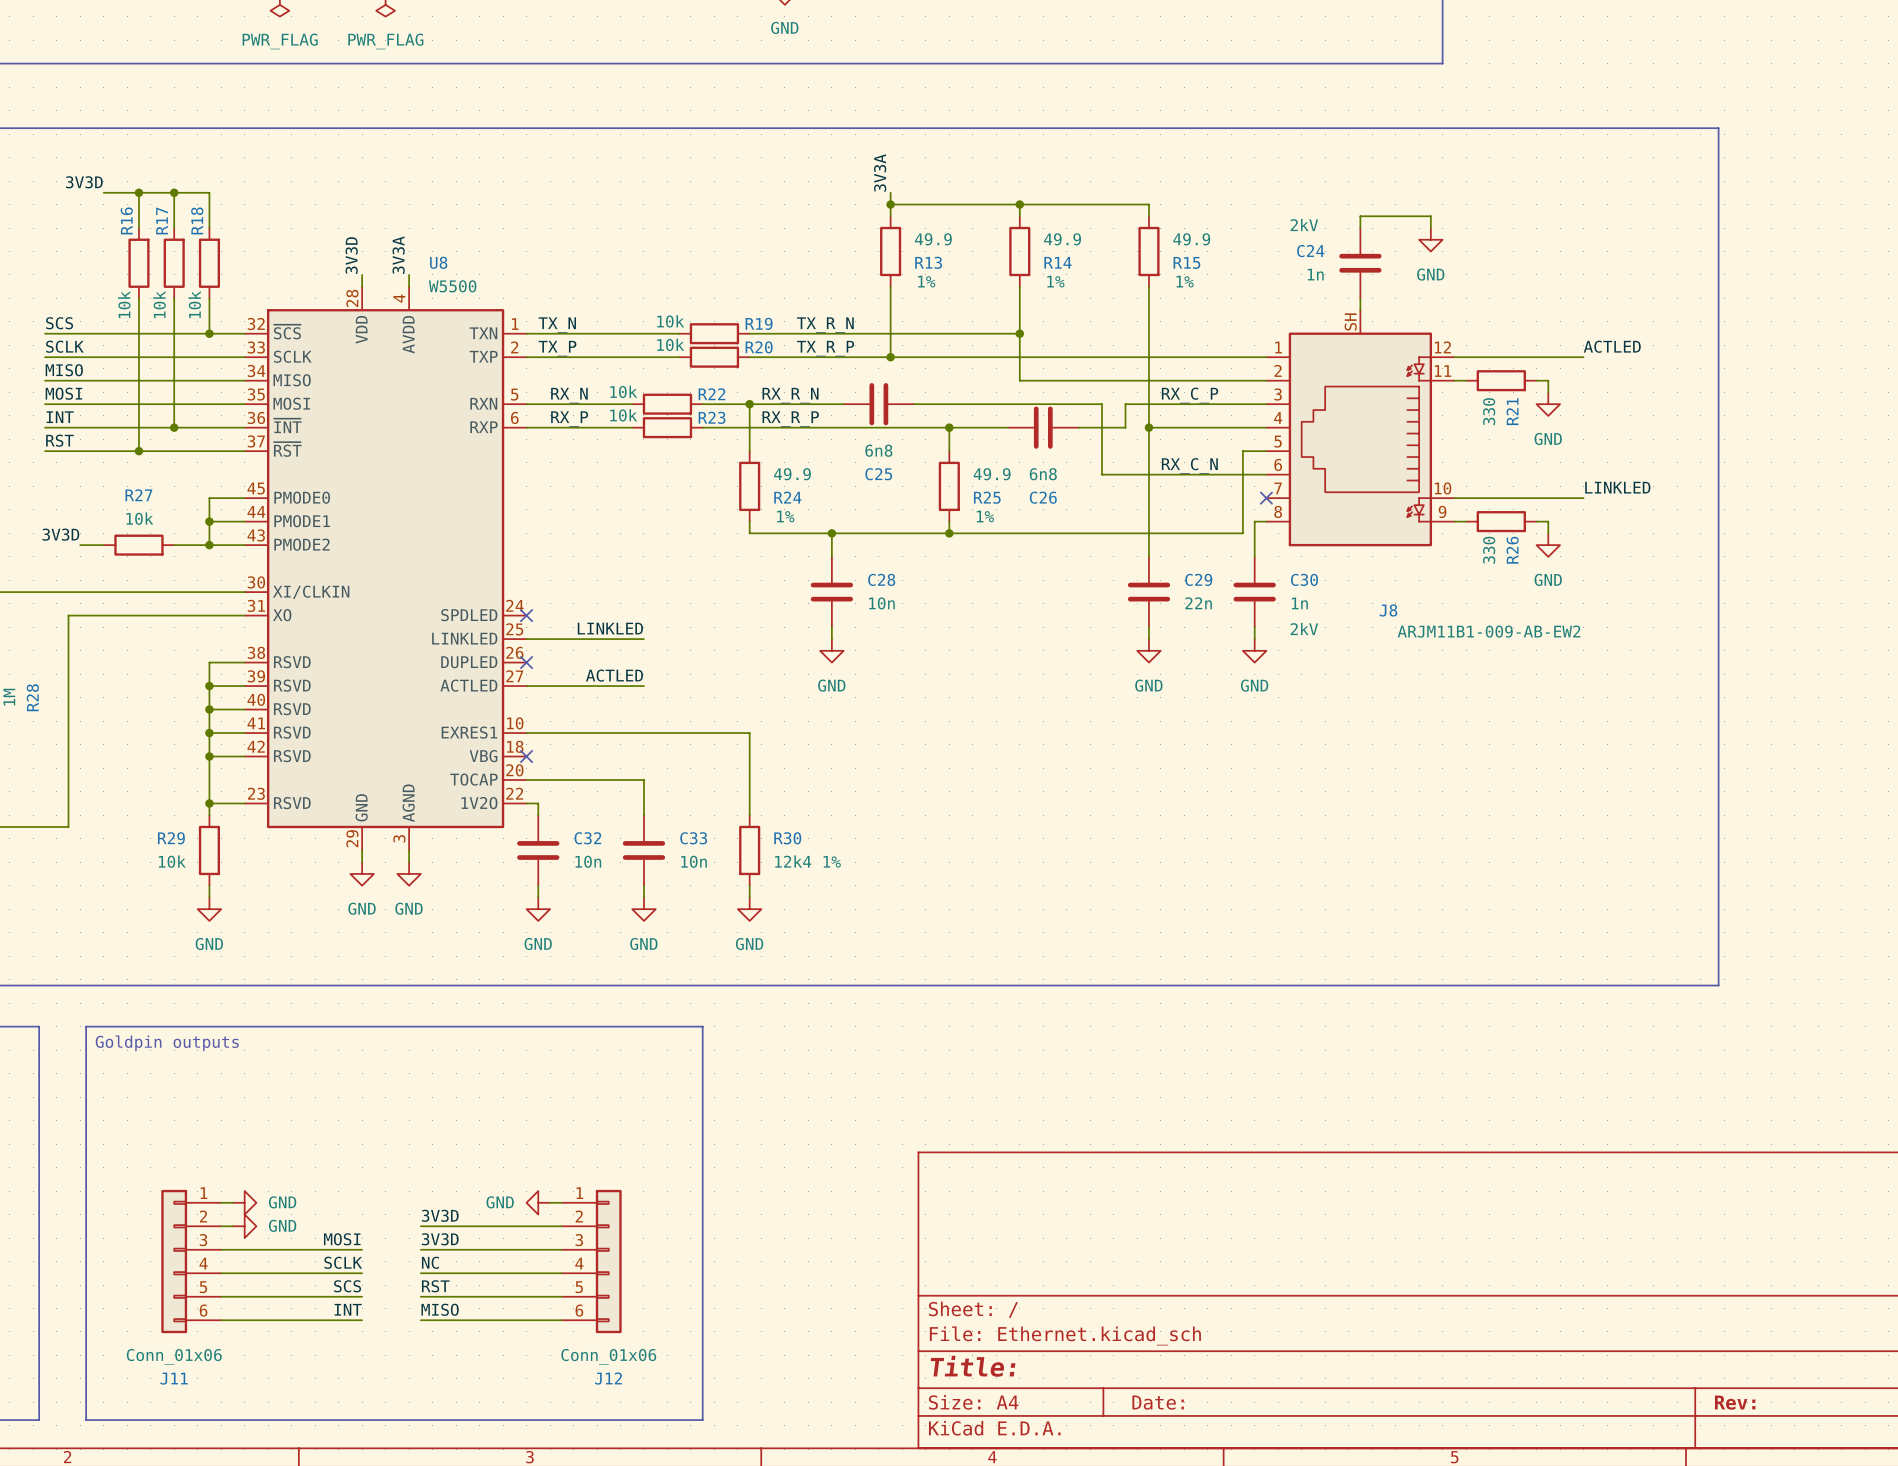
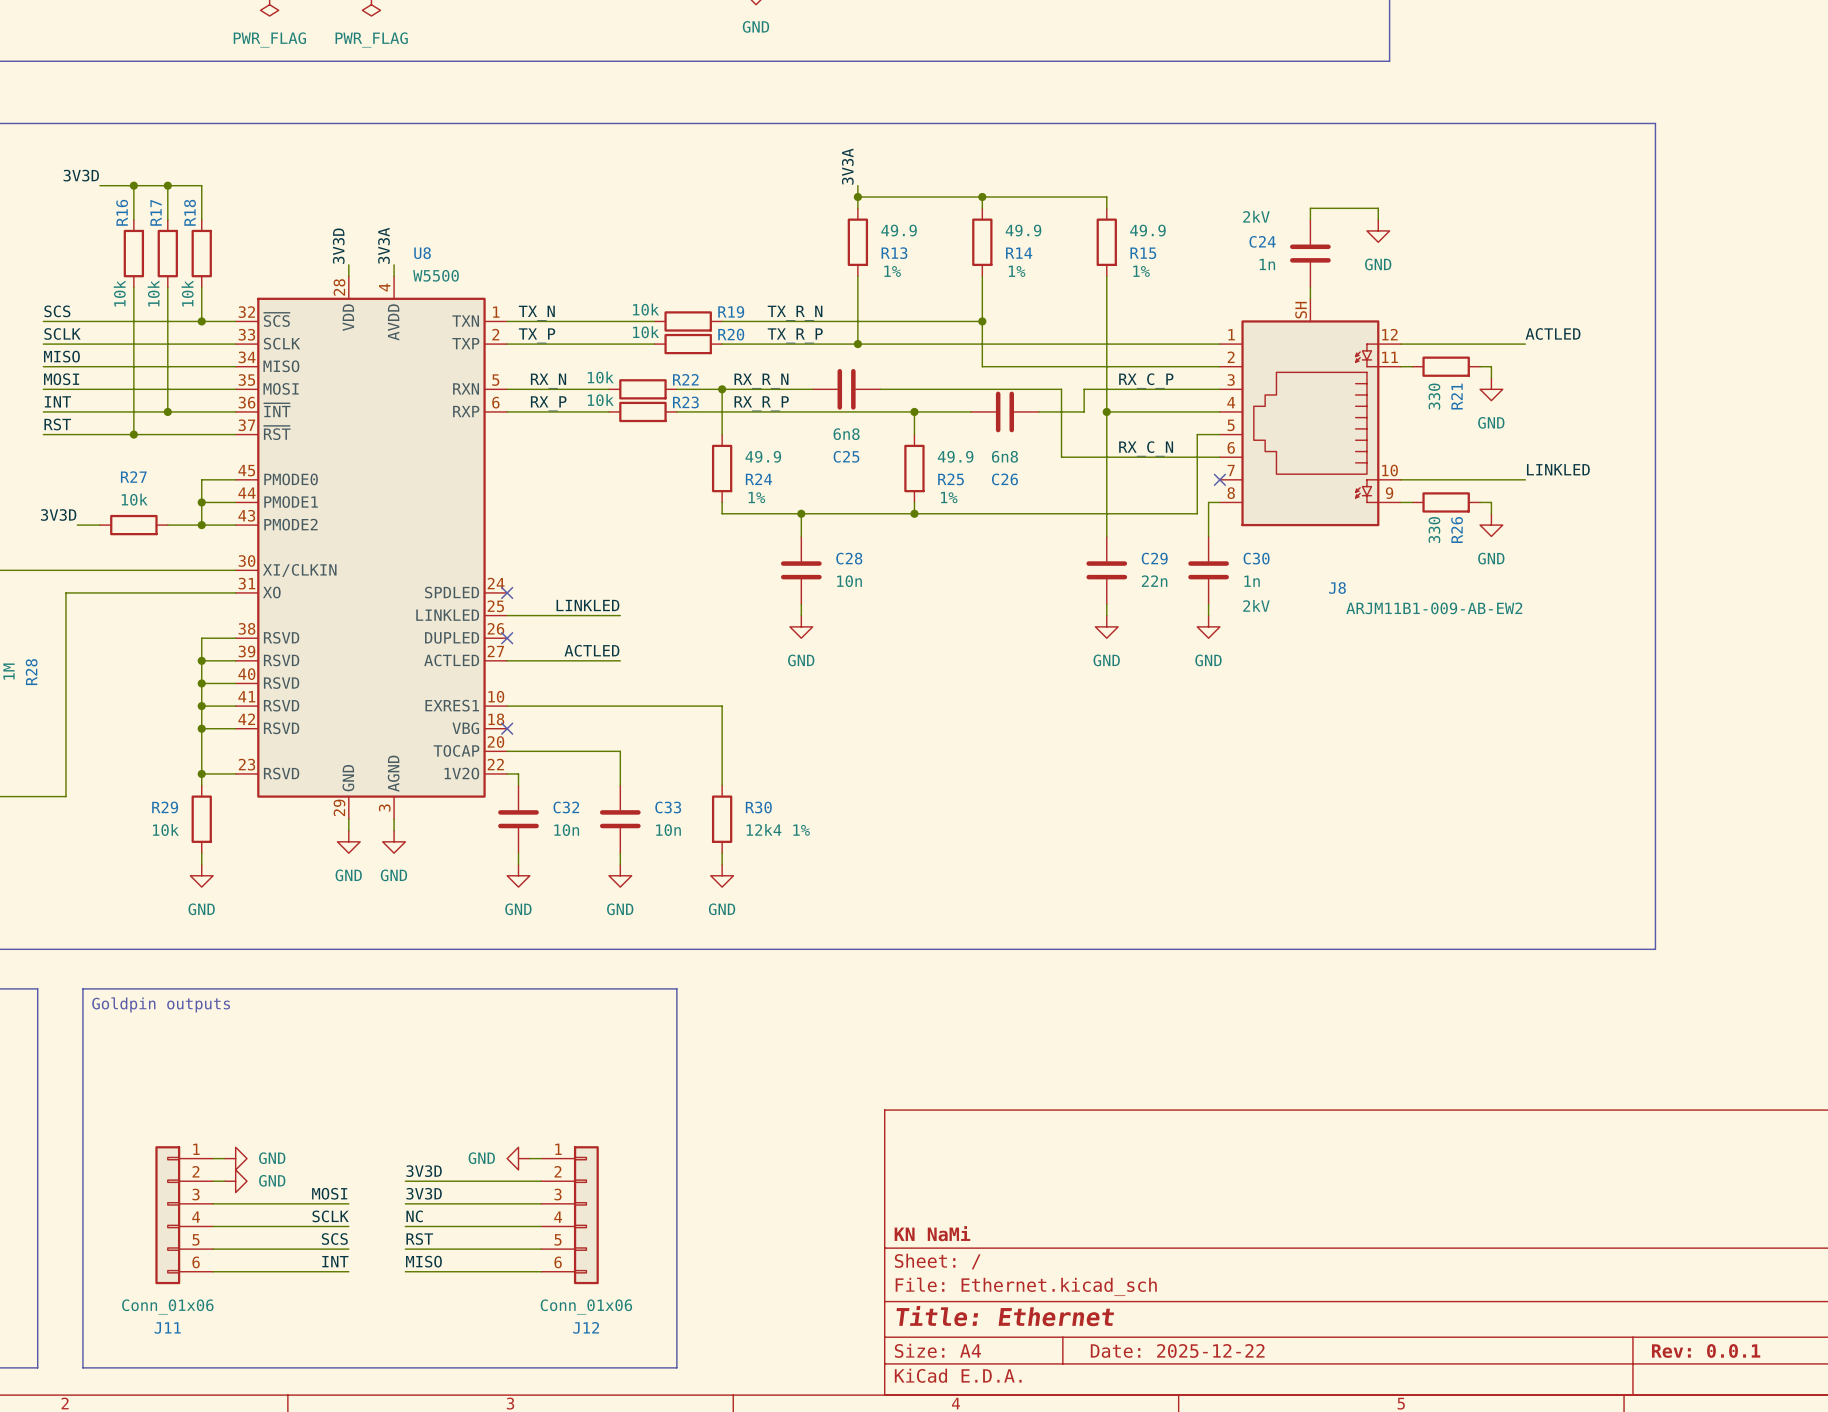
title block: none -> KN NaMi (932, 1233)
title block: Title: (973, 1366) -> Title: Ethernet (1005, 1316)
title block: Date: (1158, 1402) -> Date: 2025-12-22 (1177, 1350)
title block: Rev: (1735, 1402) -> Rev: 0.0.1 (1706, 1350)

